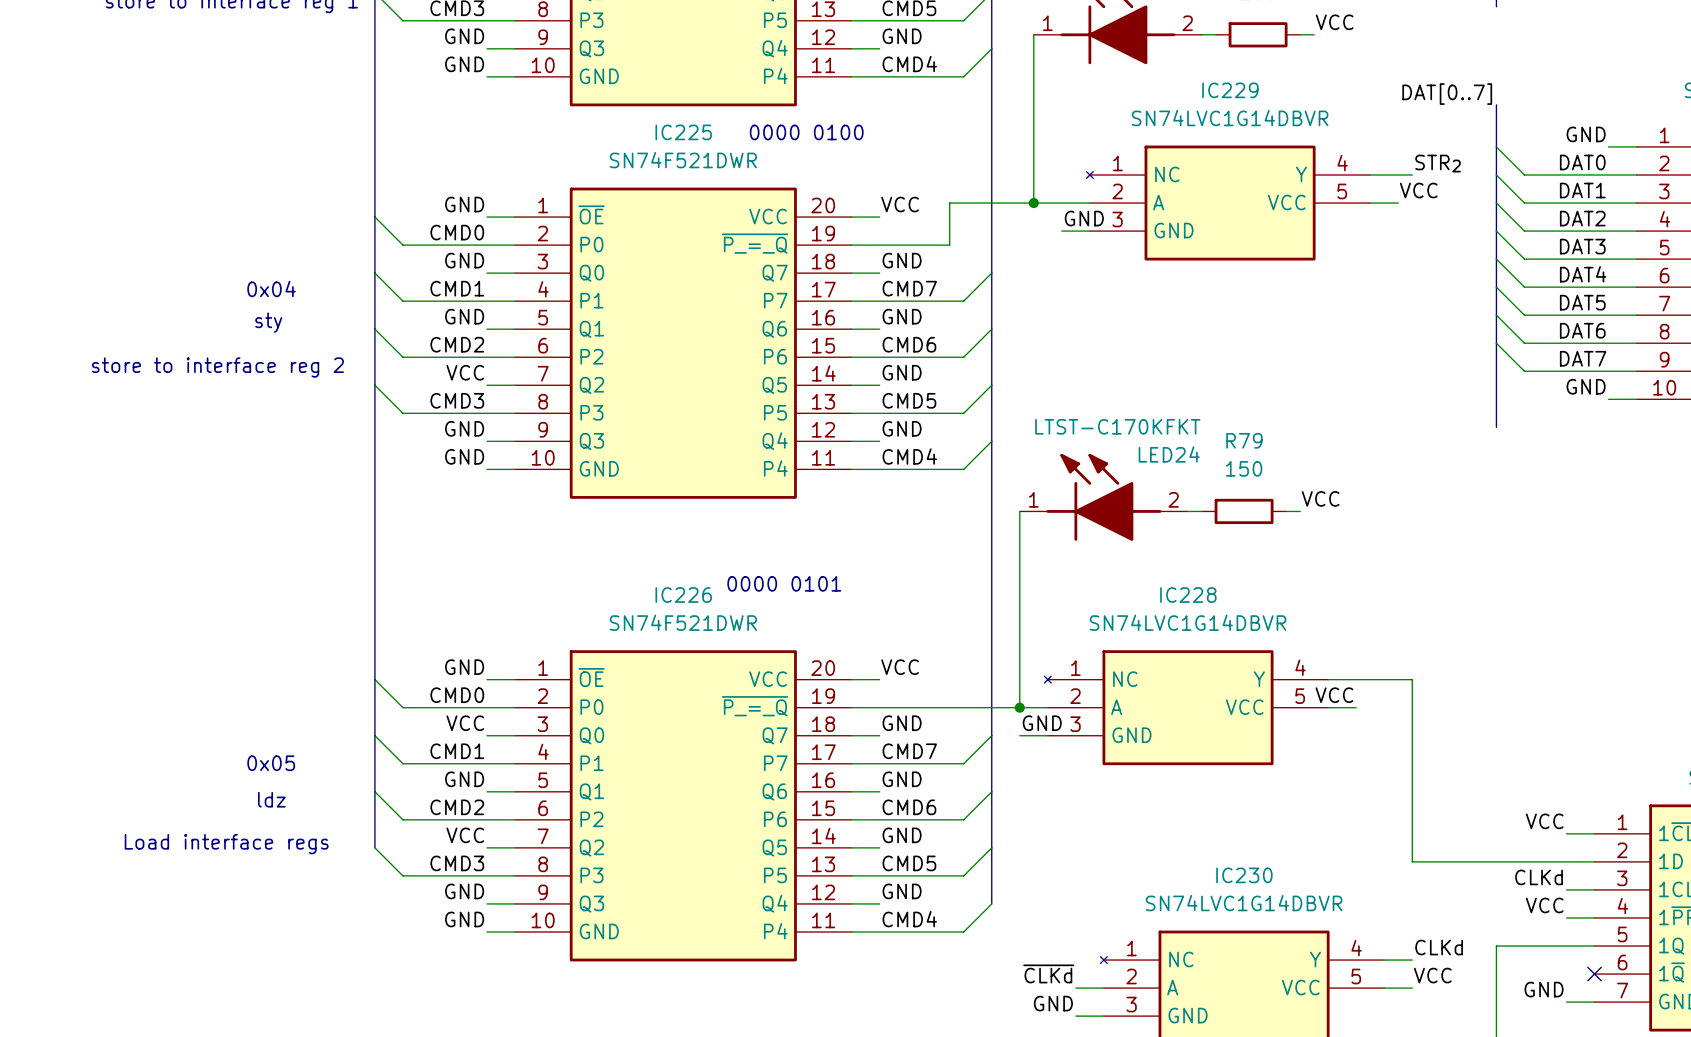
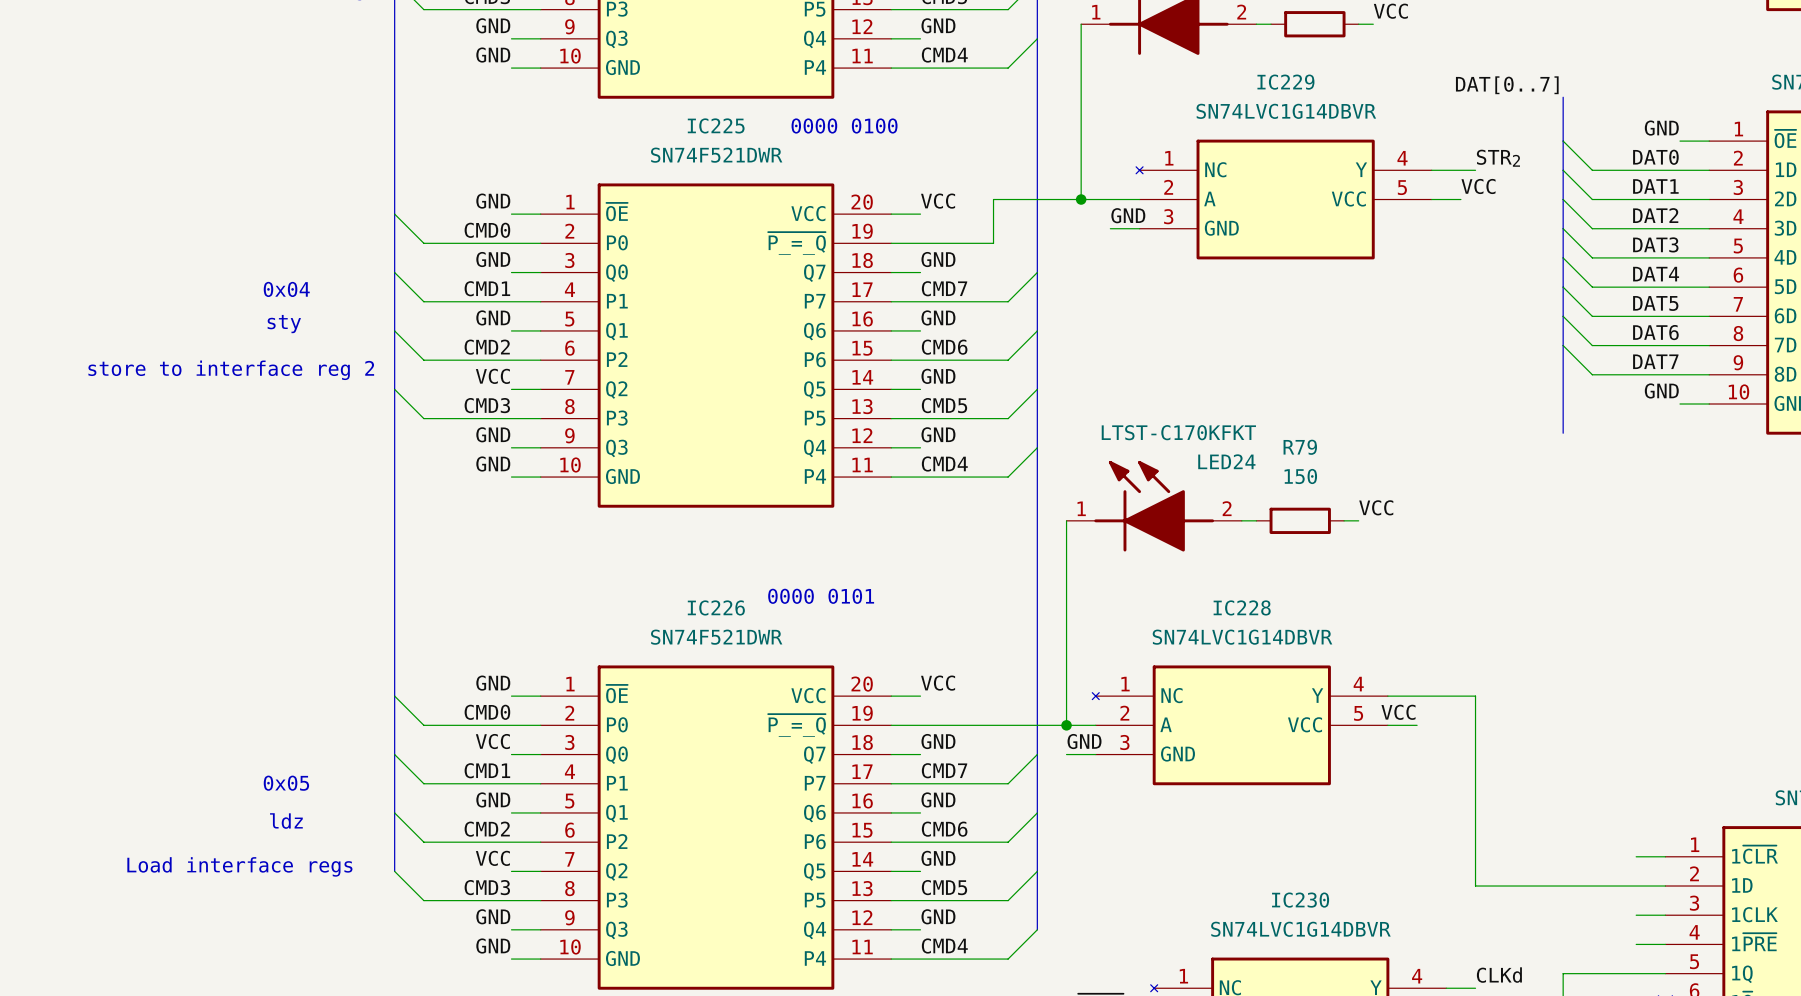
label: VCC (1544, 821) -> none
label: CLKd (1539, 877) -> none
label: VCC (1544, 905) -> none

